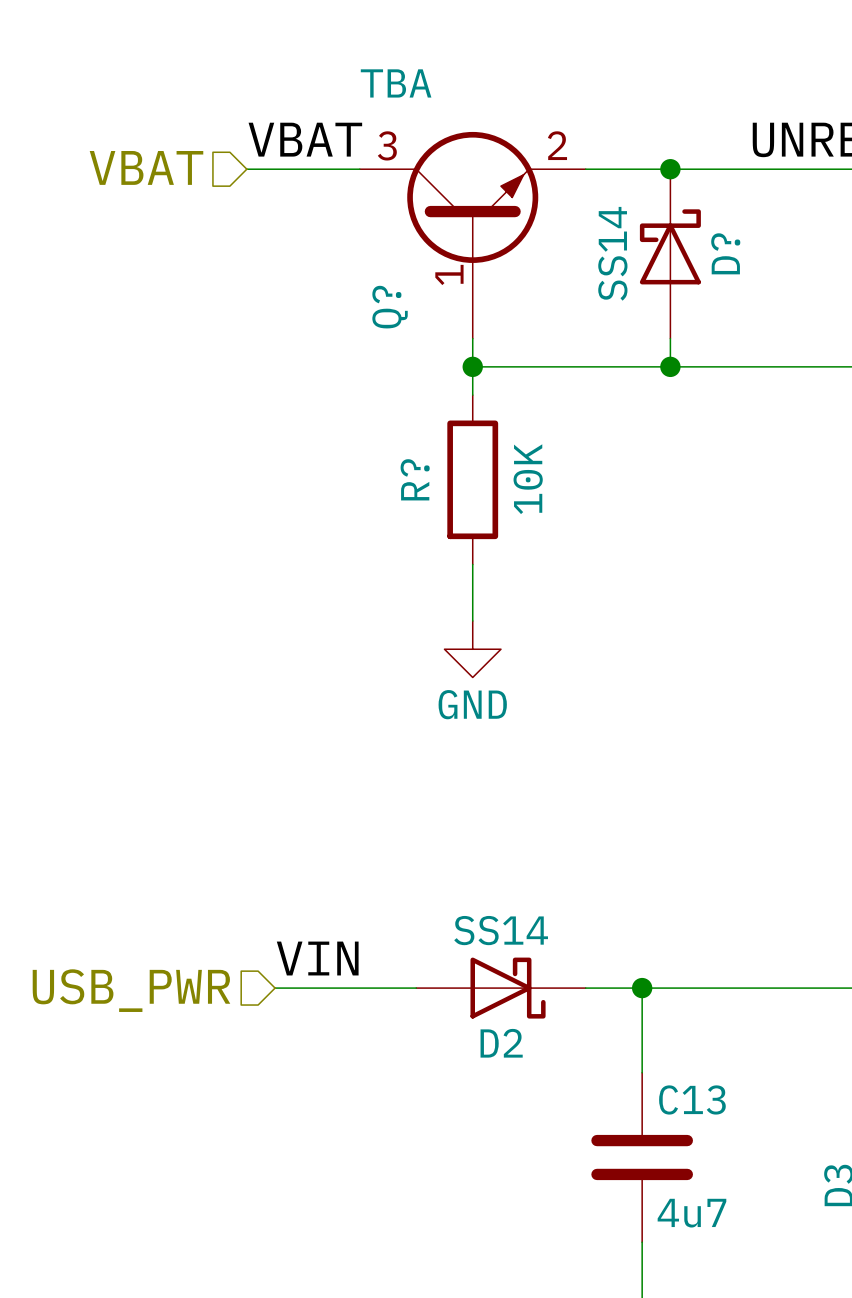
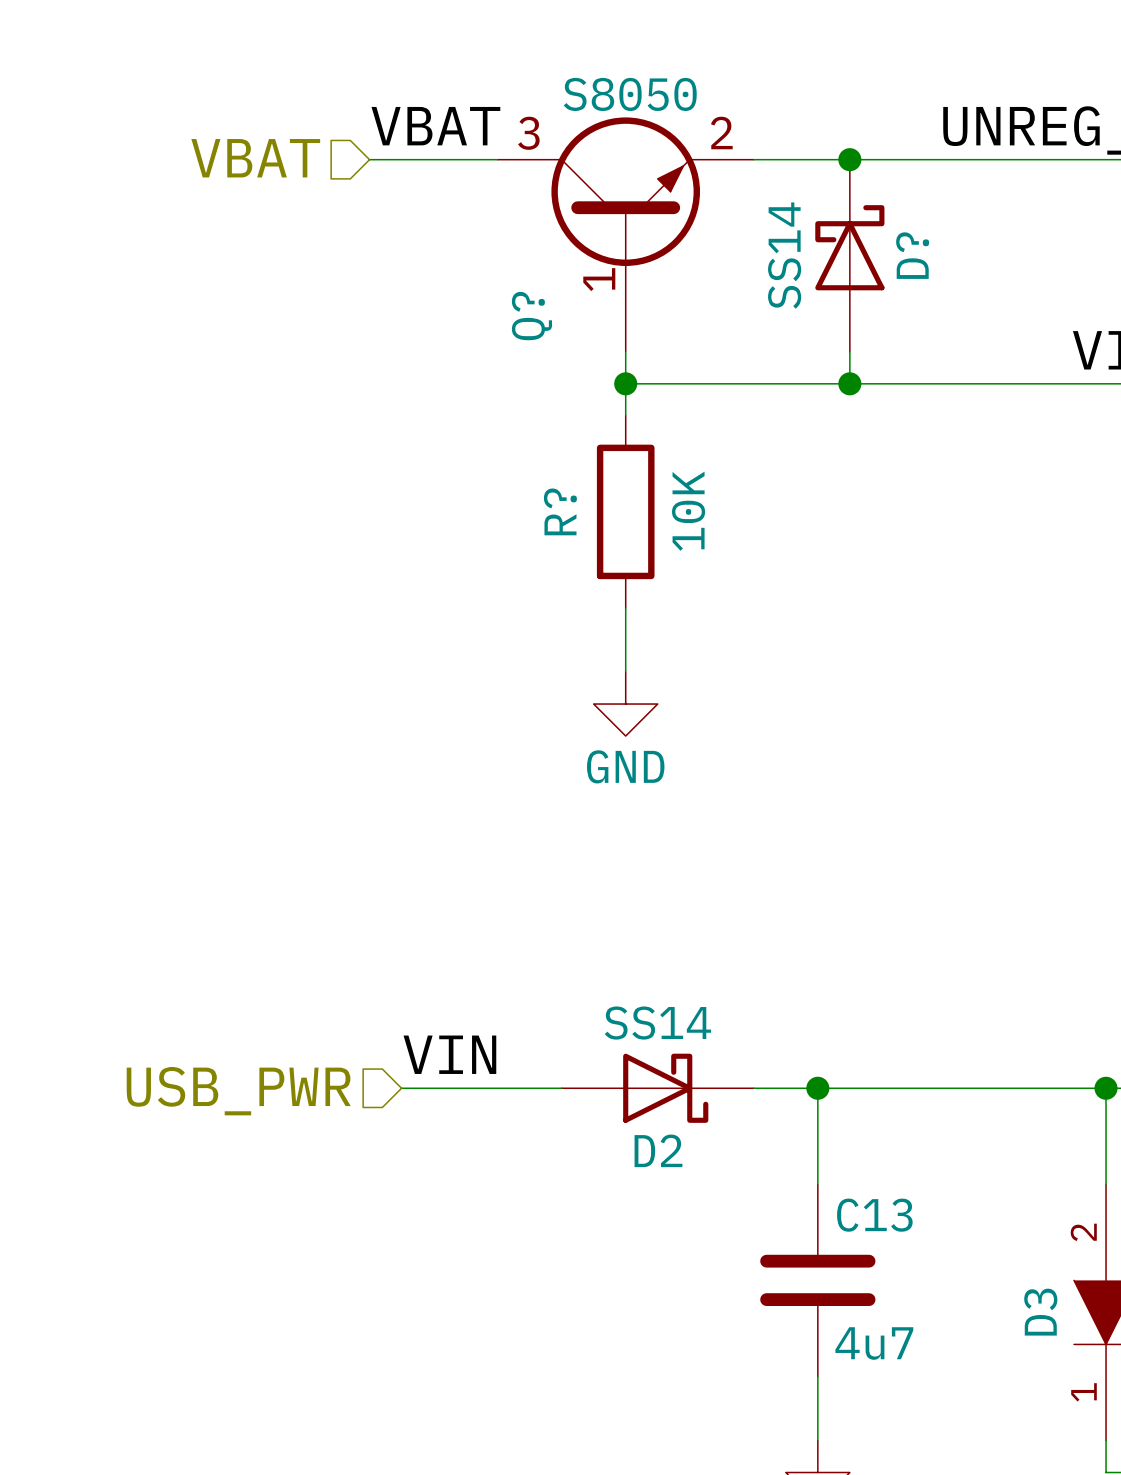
Q? value: TBA (396, 83) -> S8050 (630, 94)

